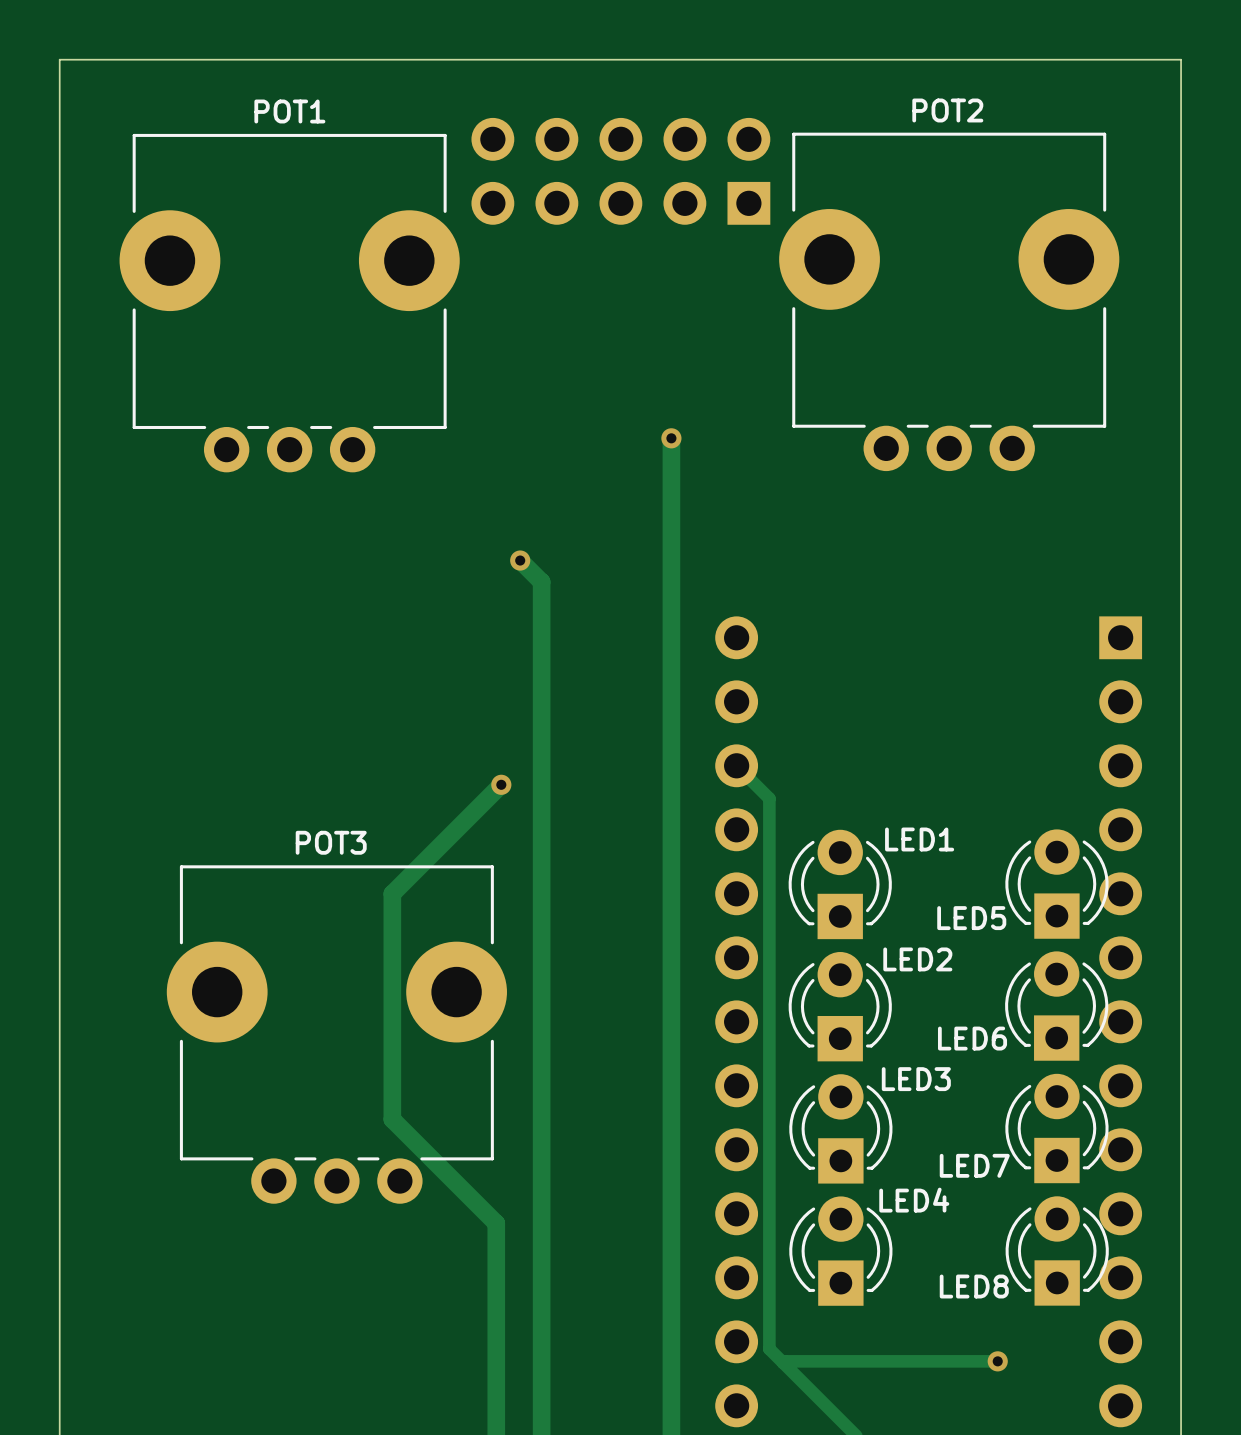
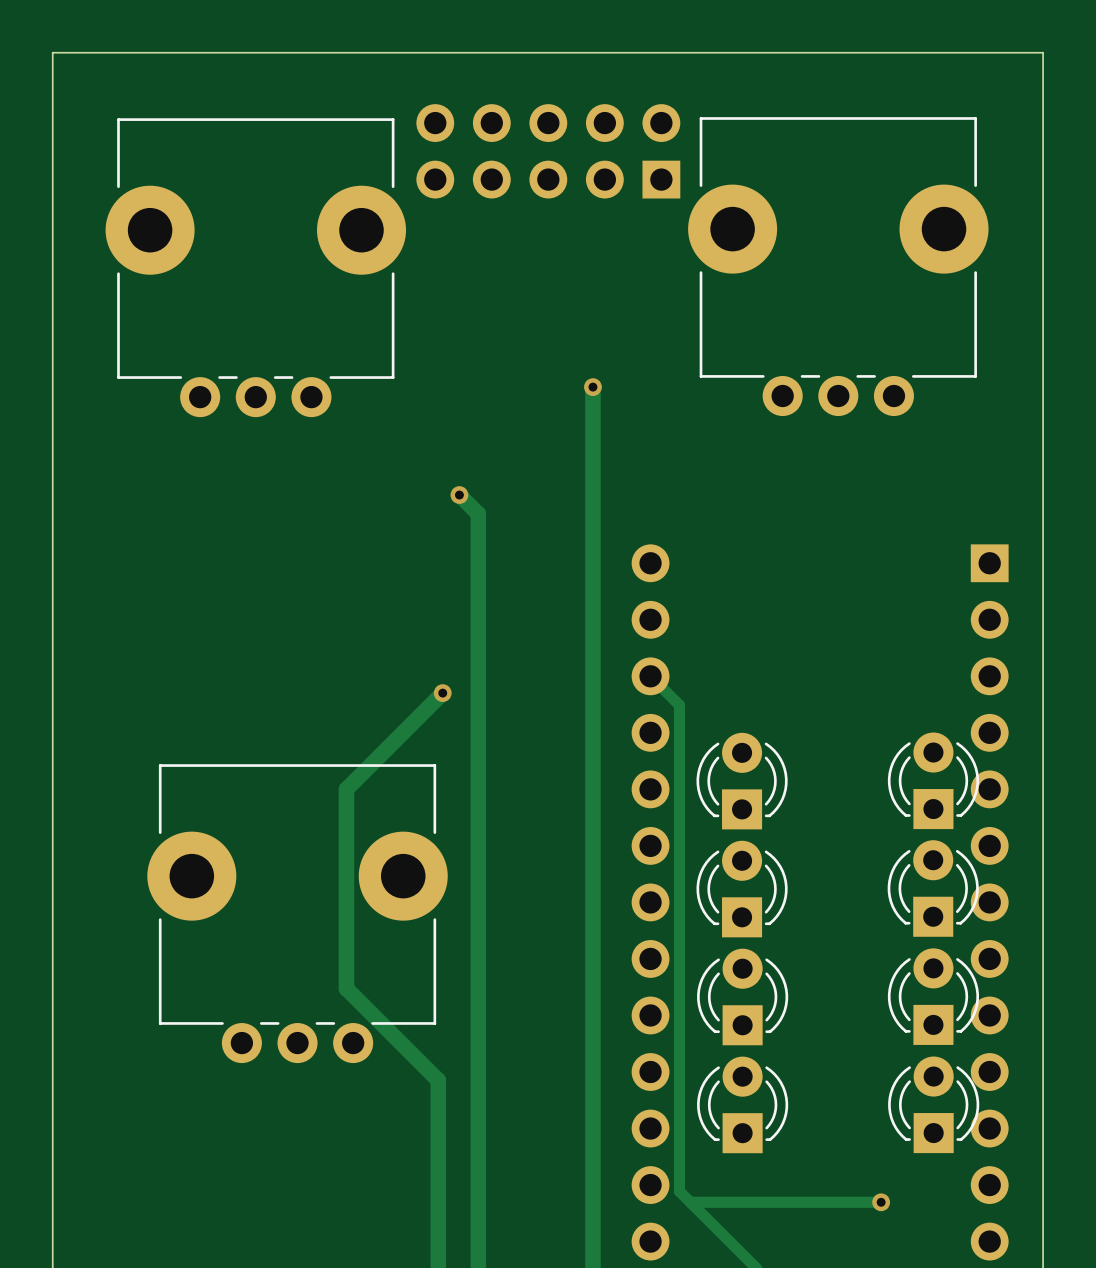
text: POT2 (947, 110) -> none
text: POT1 (289, 111) -> none
text: LED1 (919, 839) -> none
text: POT3 (331, 842) -> none
text: LED5 (971, 918) -> none
text: LED2 (917, 959) -> none
text: LED6 (972, 1038) -> none
text: LED3 (916, 1079) -> none
text: LED7 (974, 1165) -> none
text: LED4 (914, 1200) -> none
text: LED8 (974, 1286) -> none

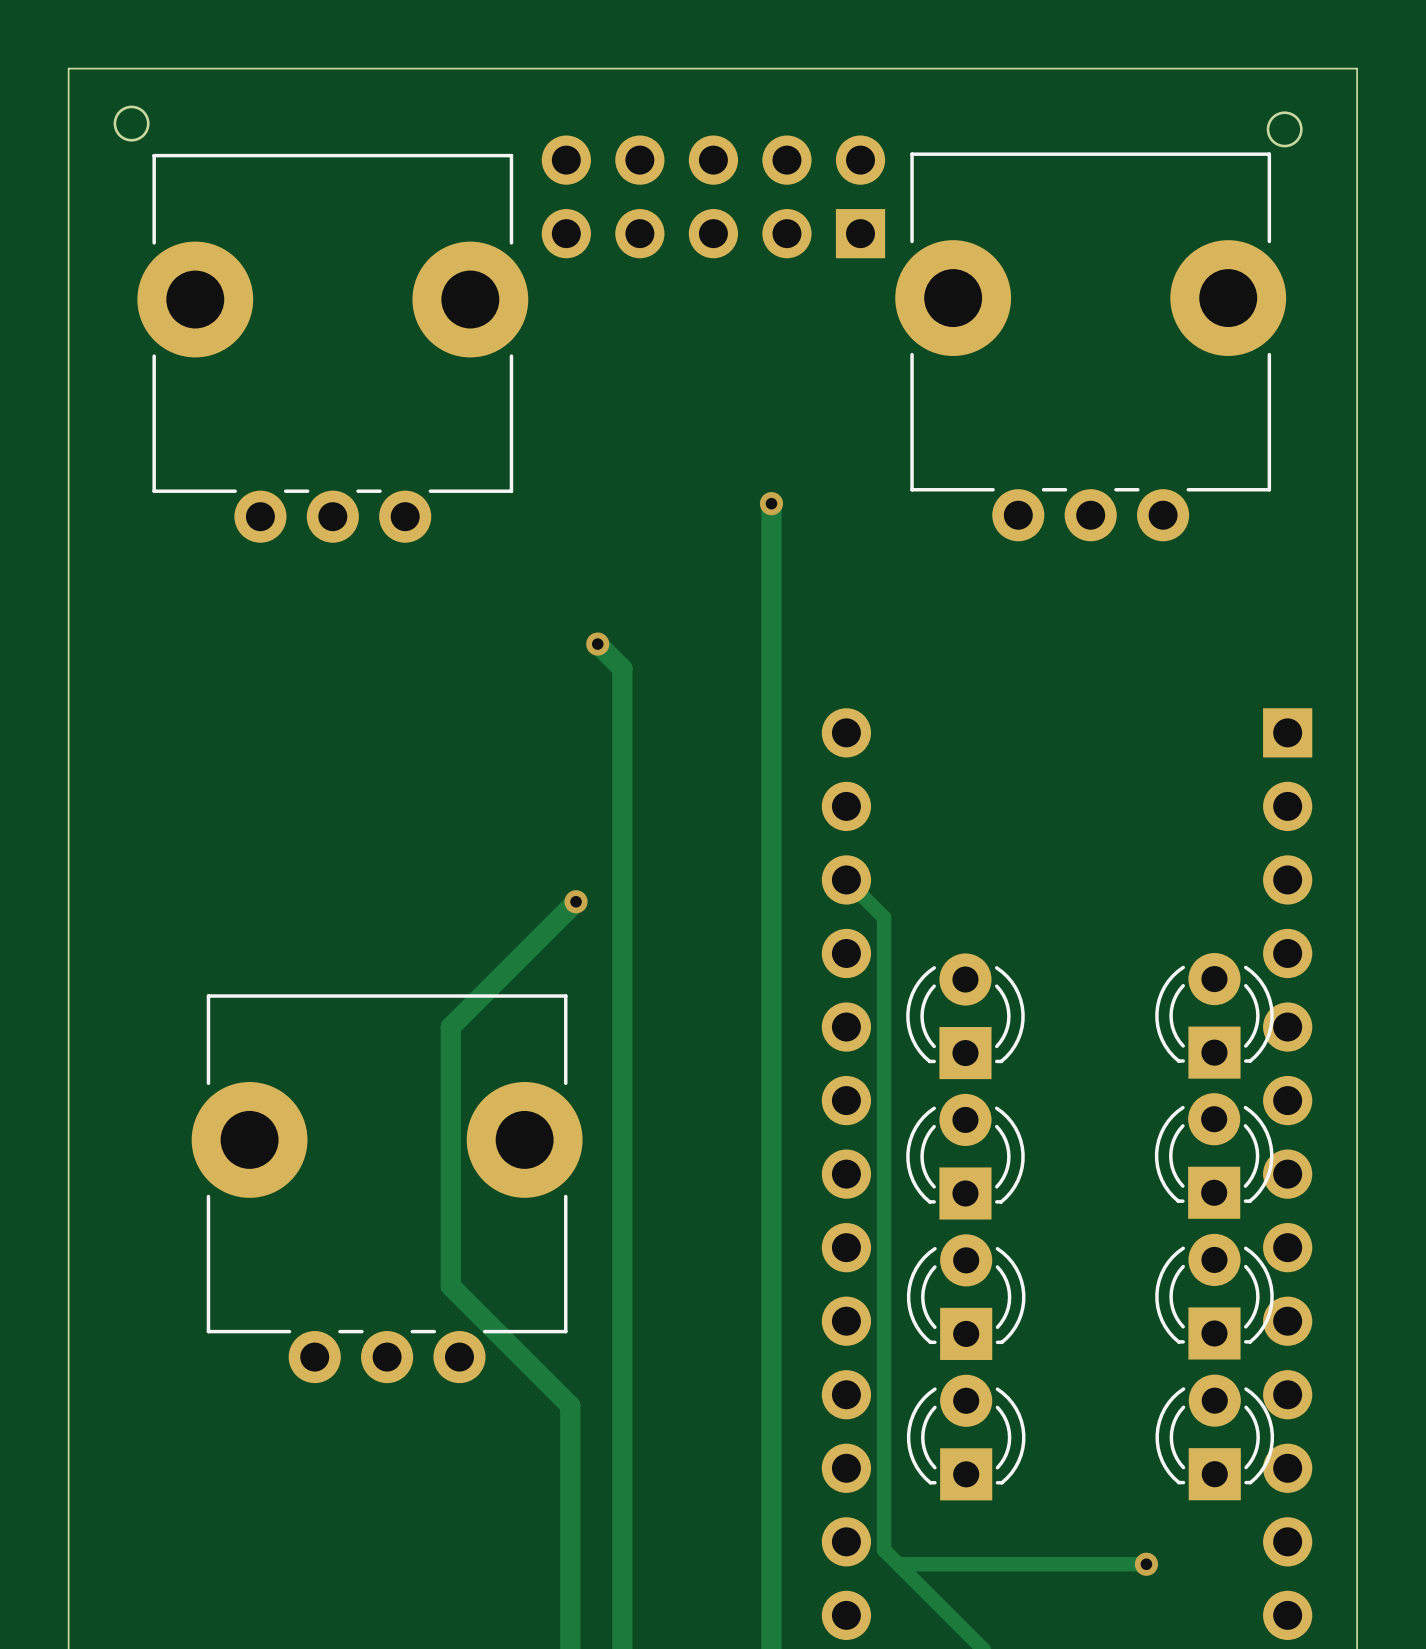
round board edge: none -> [113, 105, 150, 142]
round board edge: none -> [1266, 111, 1303, 148]

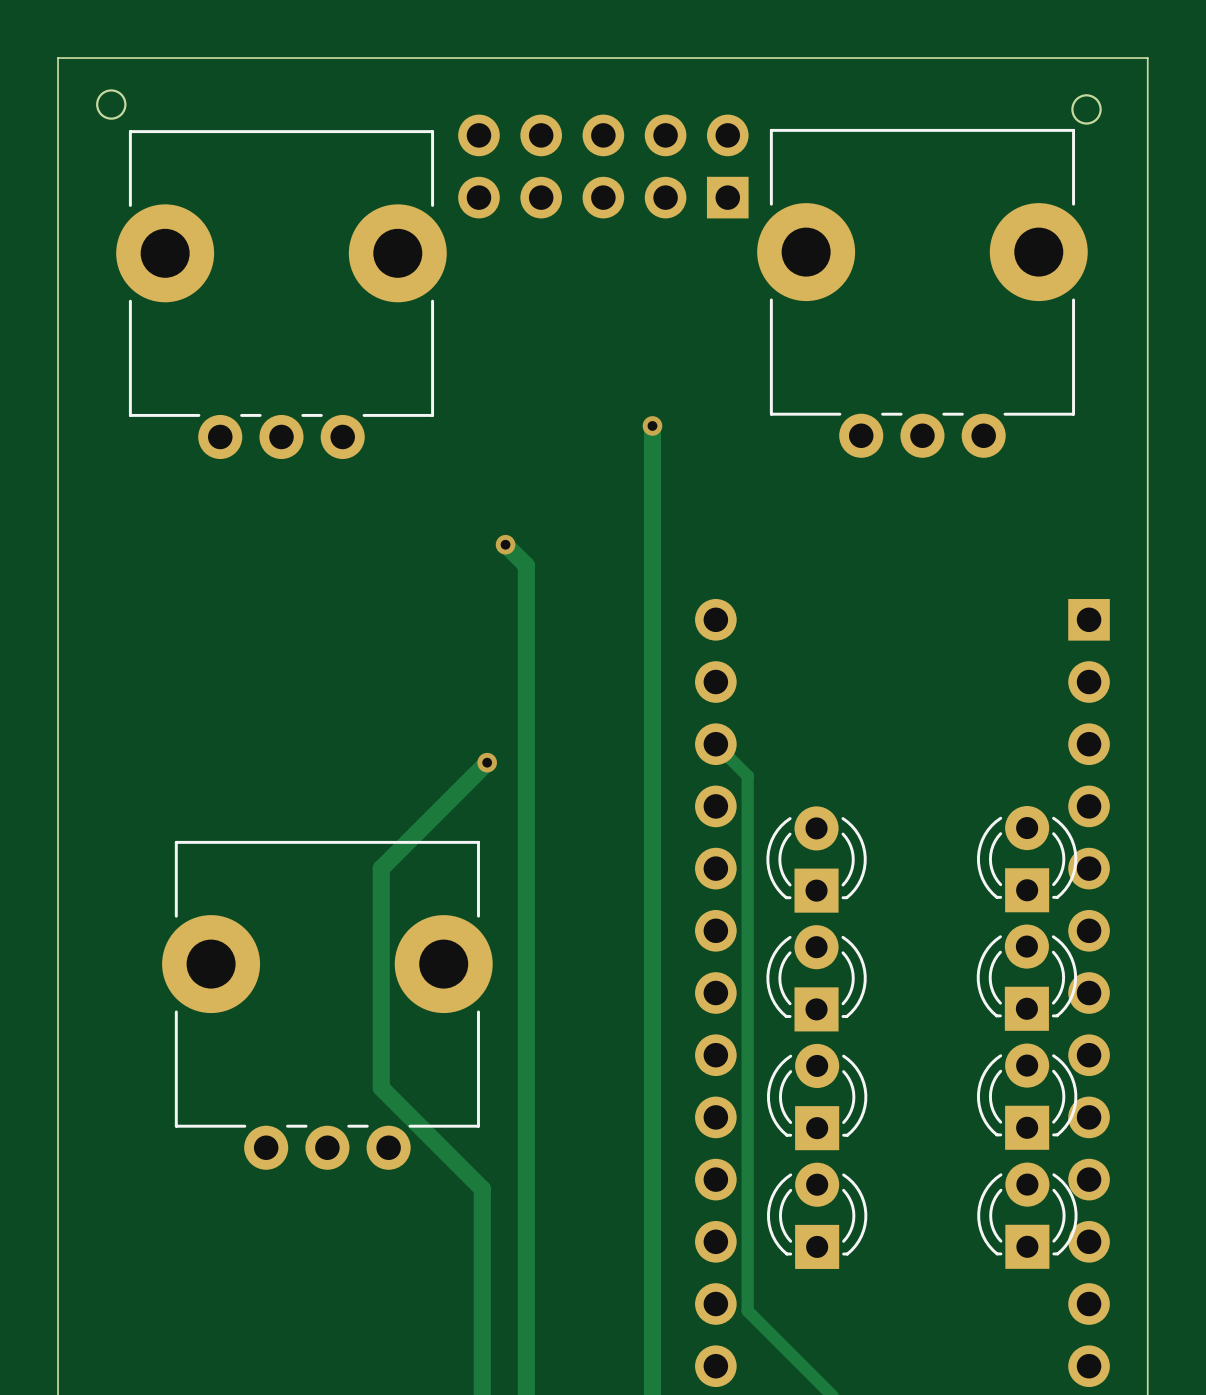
track: (1146, 1564) (901, 1564) (900, 1566) -> none
via: (1146, 1564) -> none

